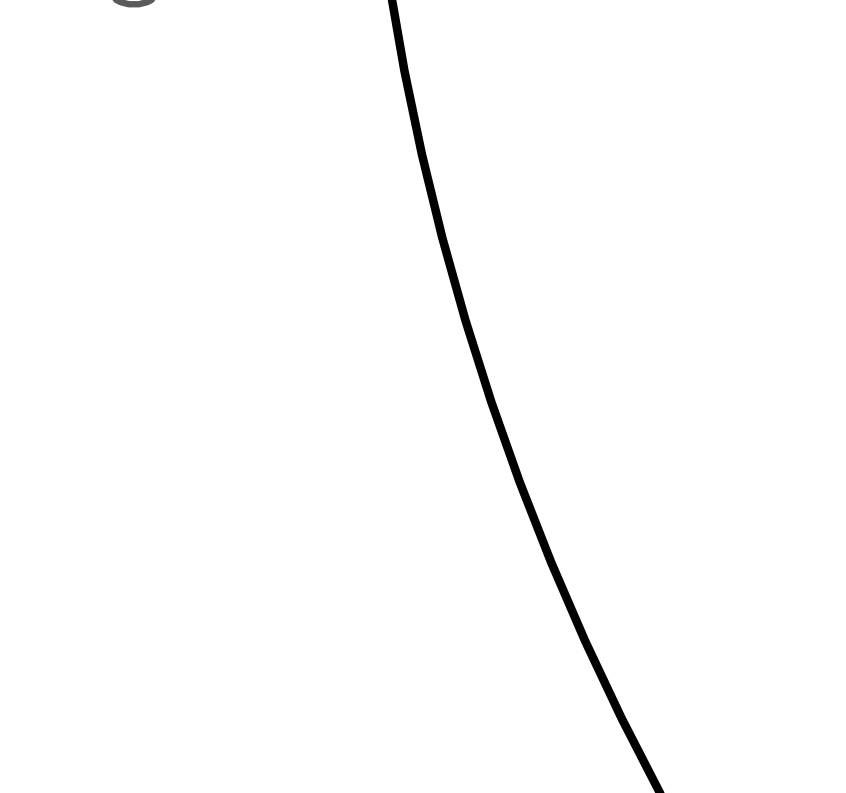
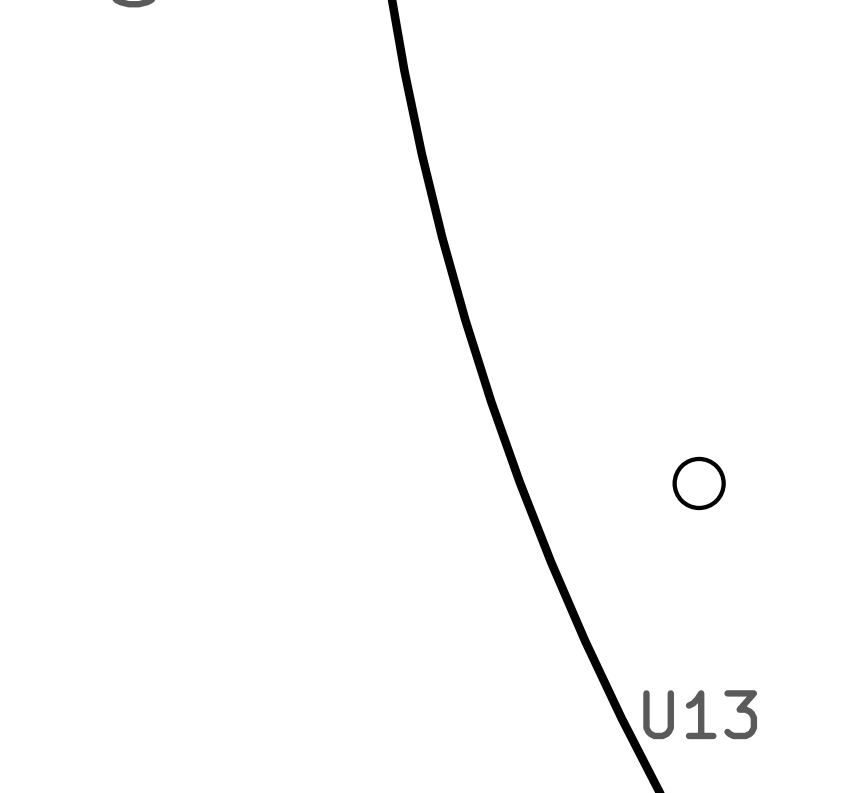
U13: none -> (699, 483)

